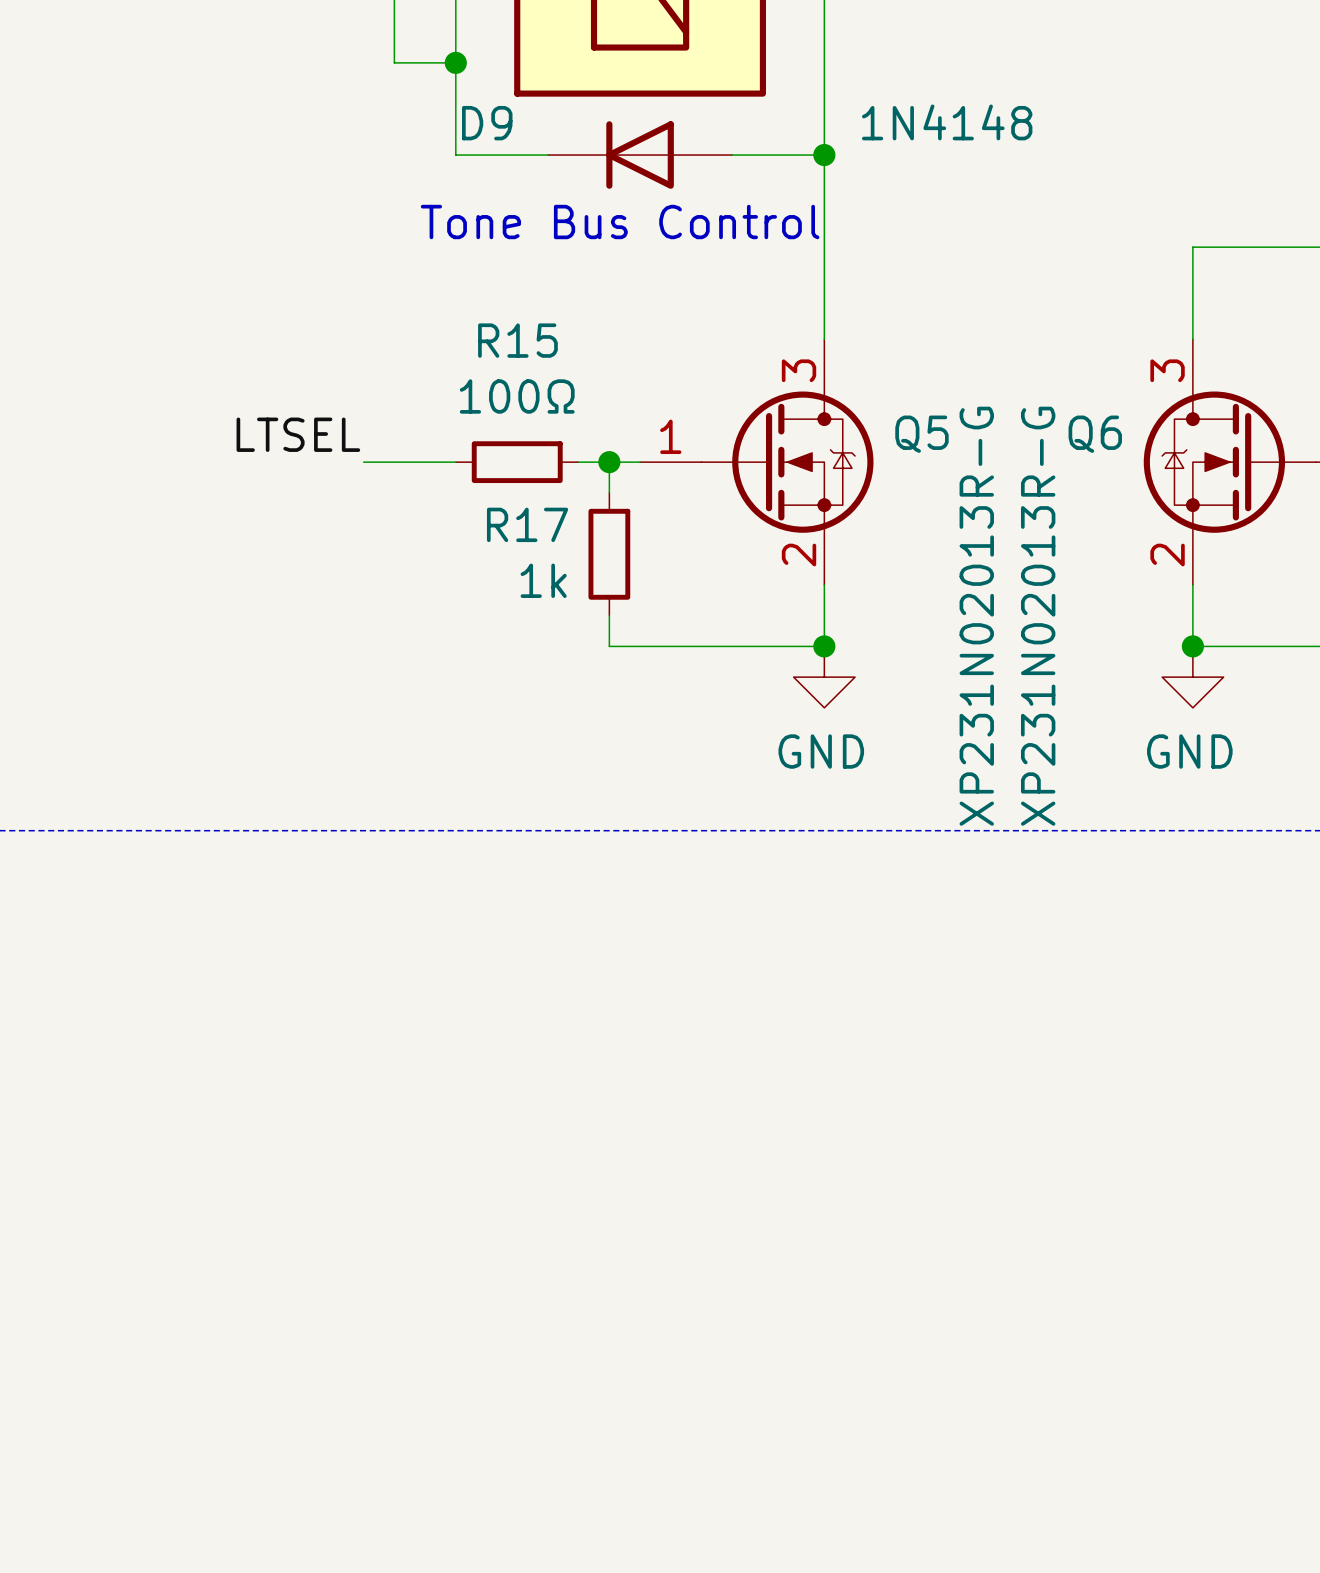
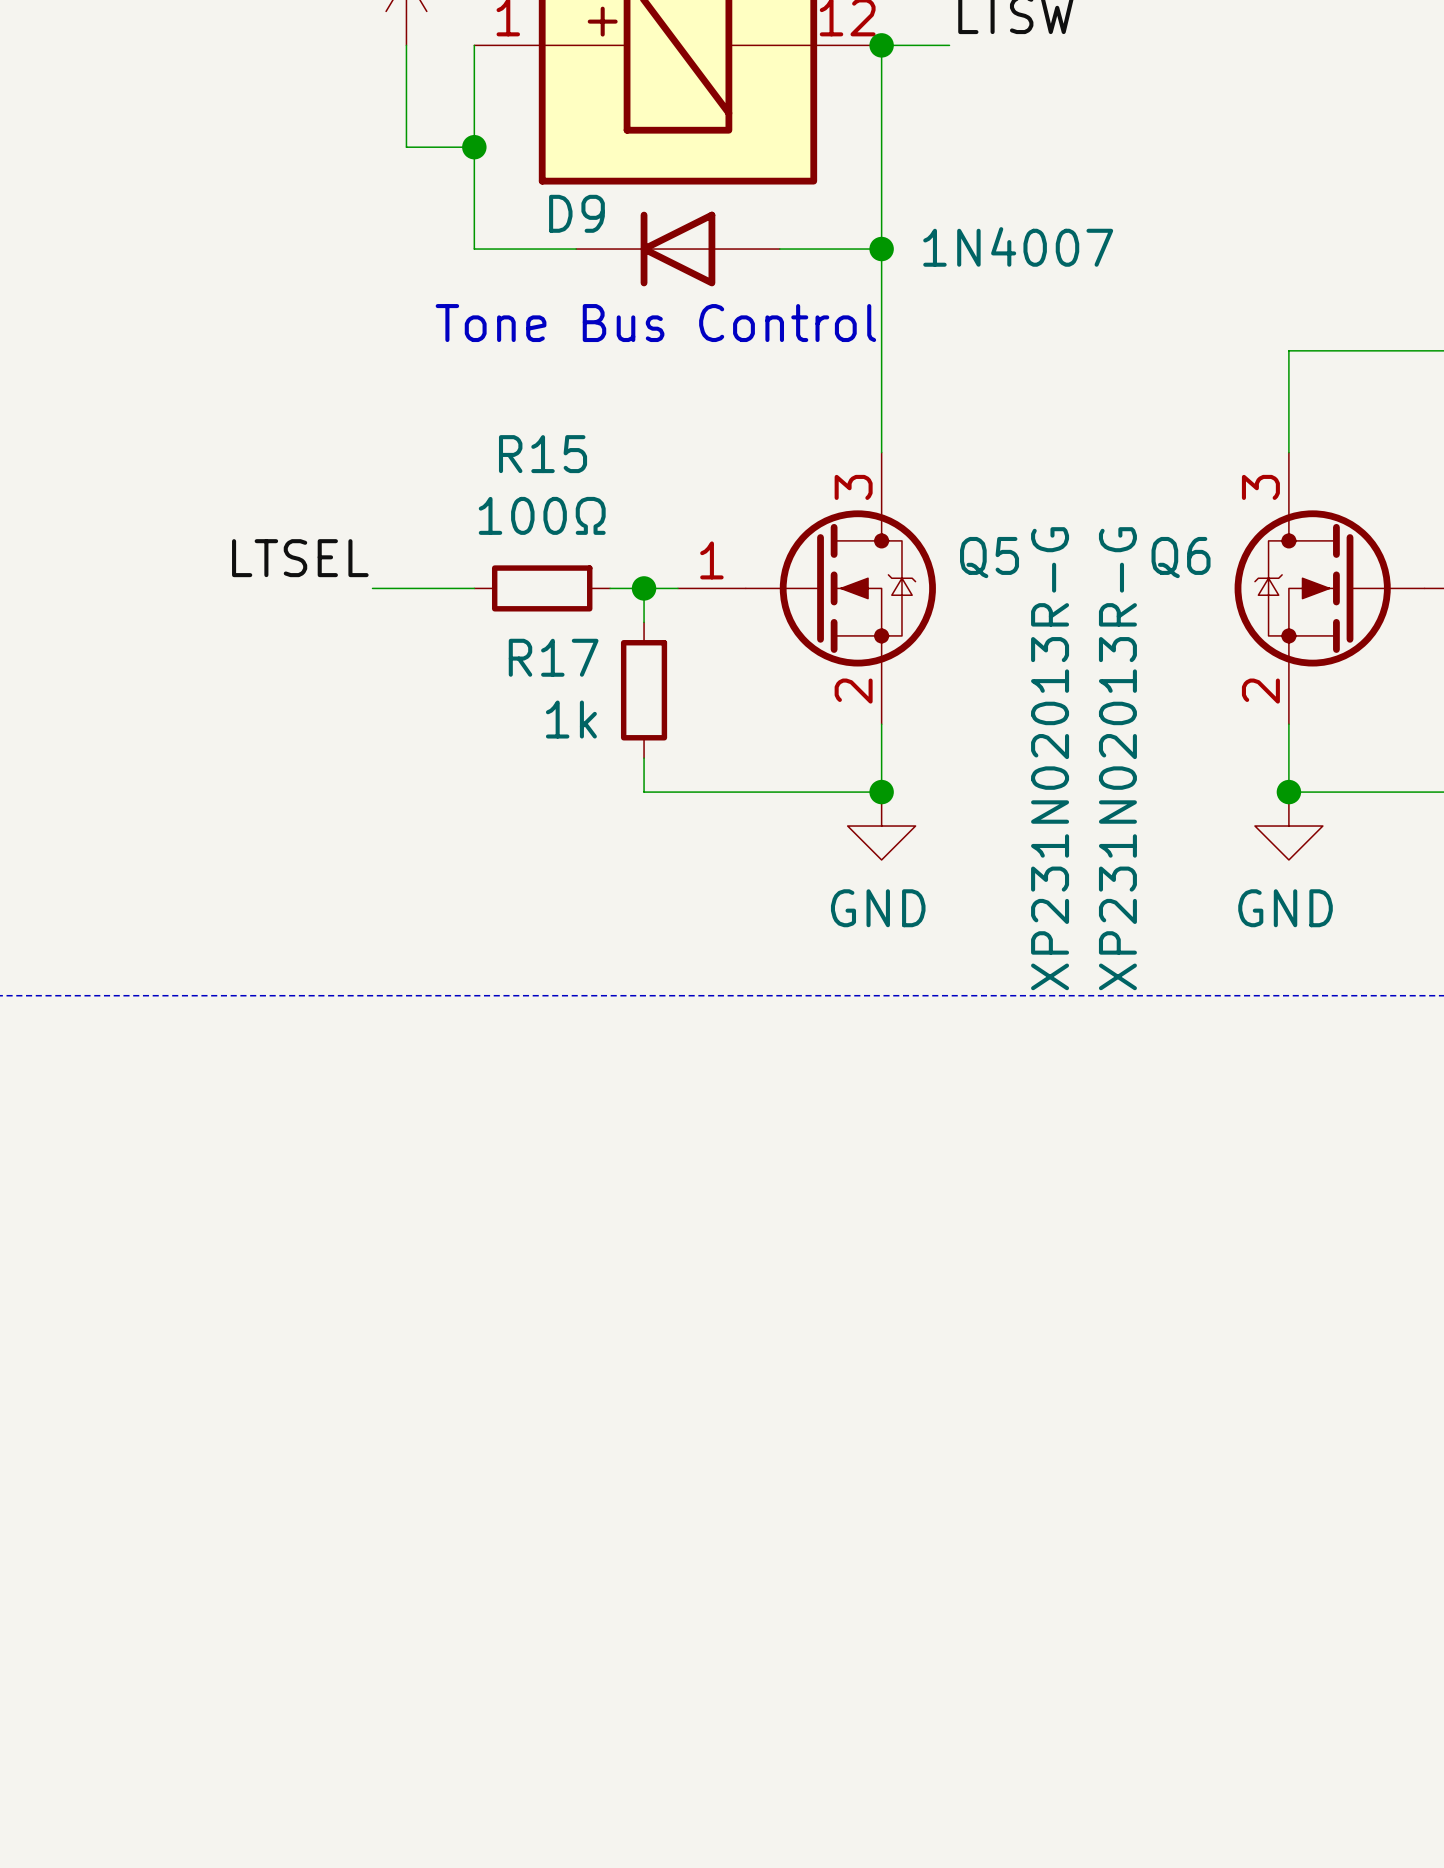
D9 value: 1N4148 (947, 122) -> 1N4007 (1018, 246)
D9 name position: D9 (487, 123) -> D9 (576, 213)

